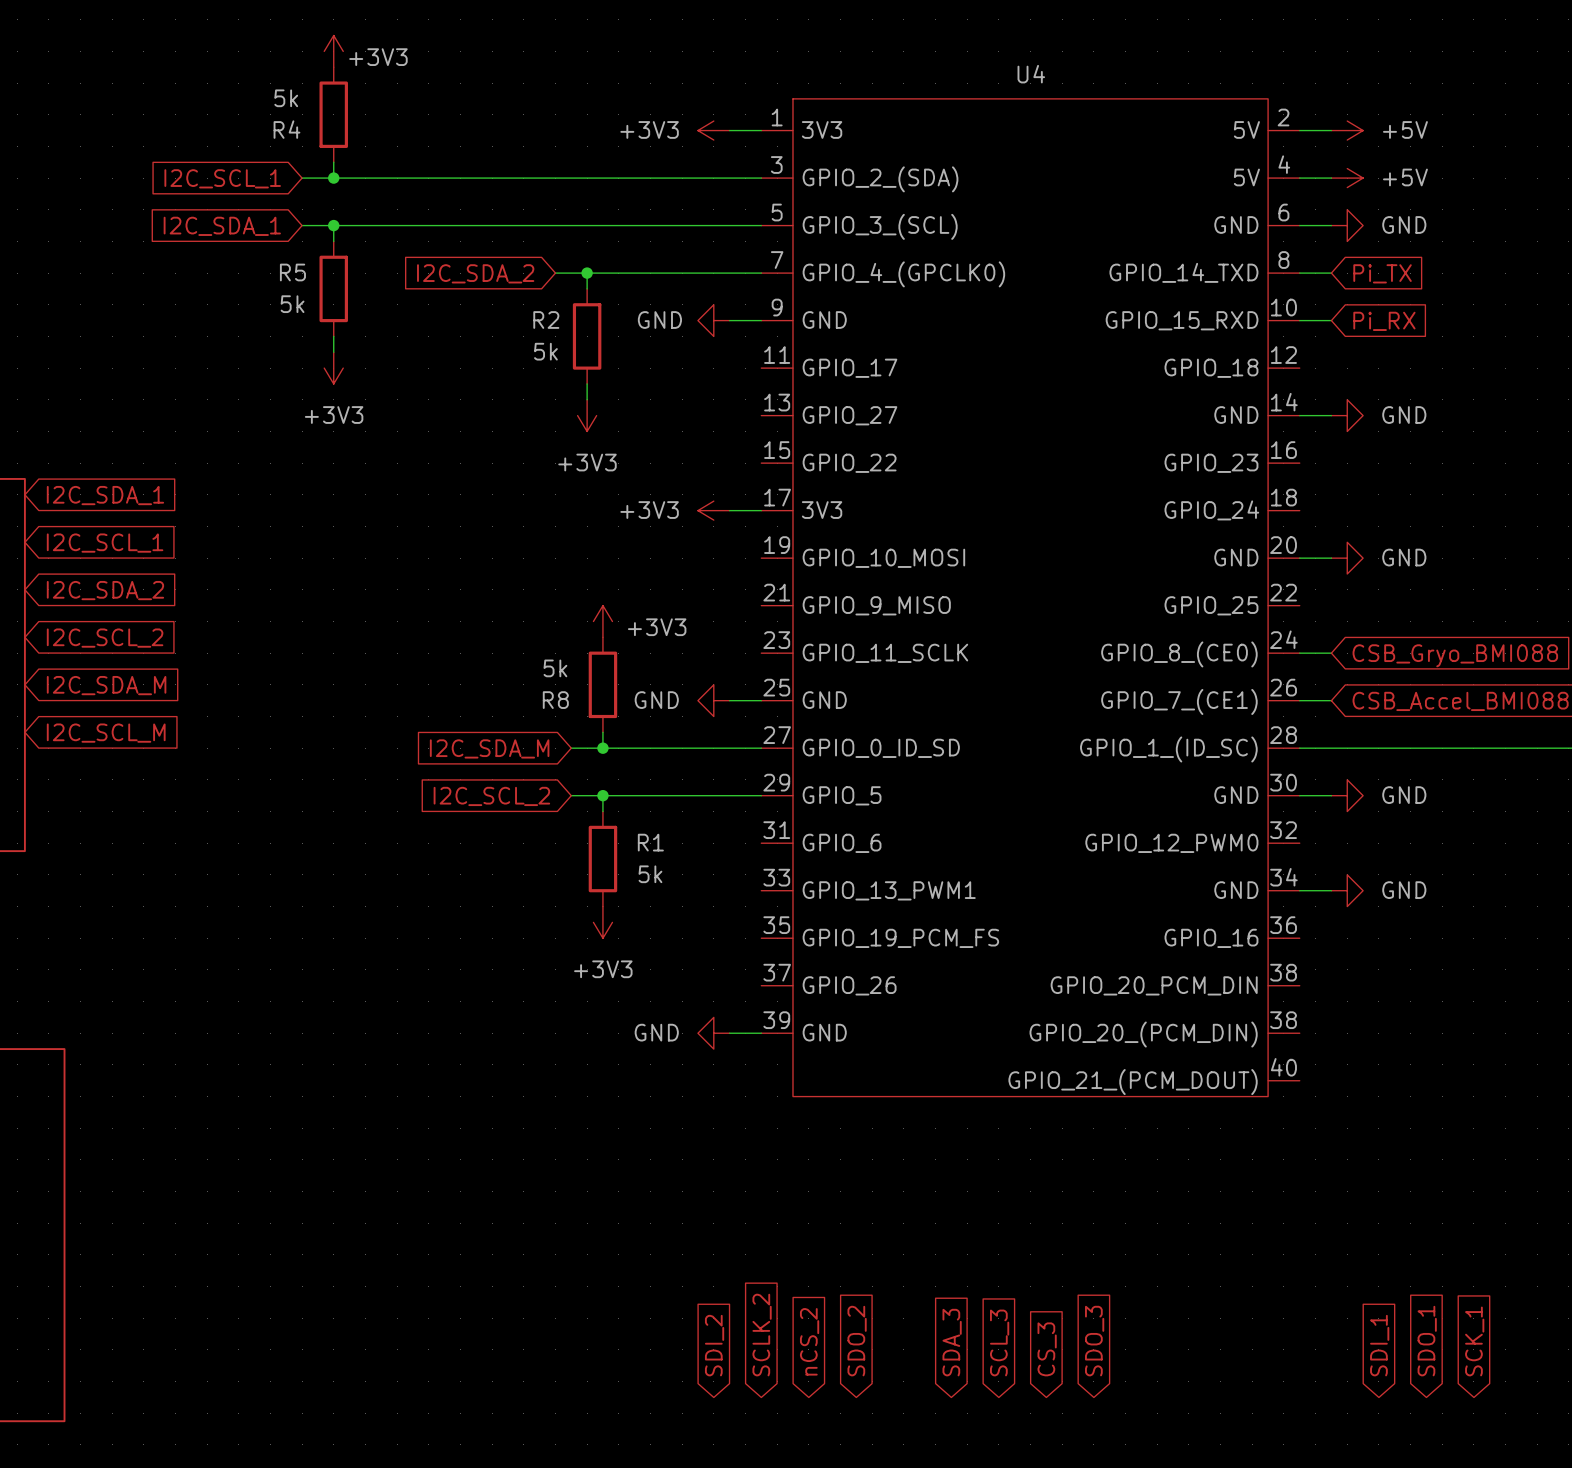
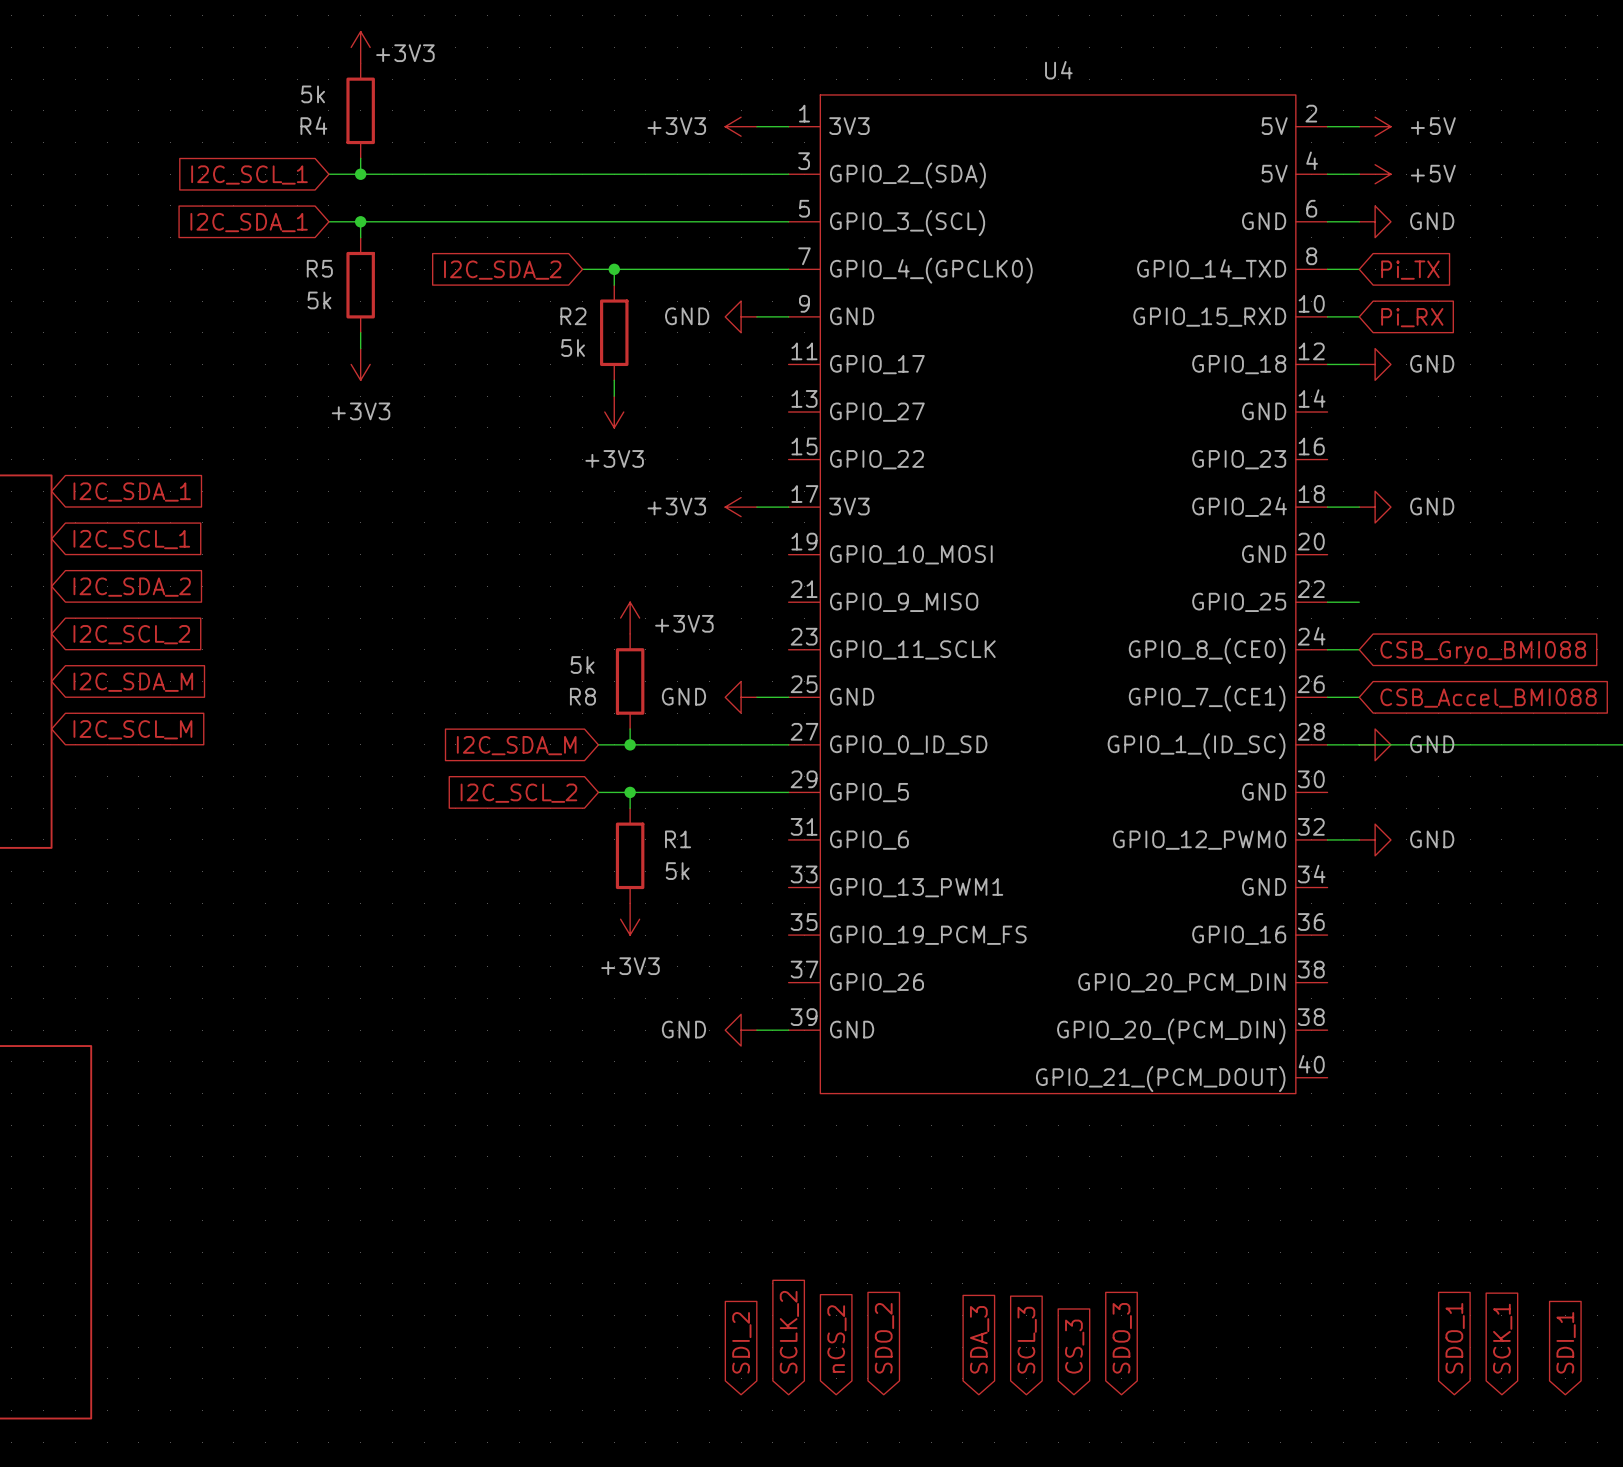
power symbol: none -> GND (1375, 364)
wire: (1299, 415) (1331, 415) -> (1327, 364) (1359, 364)
power symbol: GND (1347, 415) -> none
power symbol: none -> GND (1375, 507)
wire: (1299, 558) (1331, 558) -> (1327, 507) (1359, 507)
power symbol: GND (1347, 558) -> none
power symbol: none -> GND (1375, 744)
wire: (1299, 795) (1331, 795) -> (1327, 602) (1359, 602)
power symbol: GND (1347, 795) -> none
power symbol: none -> GND (1375, 839)
wire: (1299, 890) (1331, 890) -> (1327, 839) (1359, 839)
power symbol: GND (1347, 890) -> none
global label position: SDI_1 (1379, 1345) -> SDI_1 (1566, 1342)

